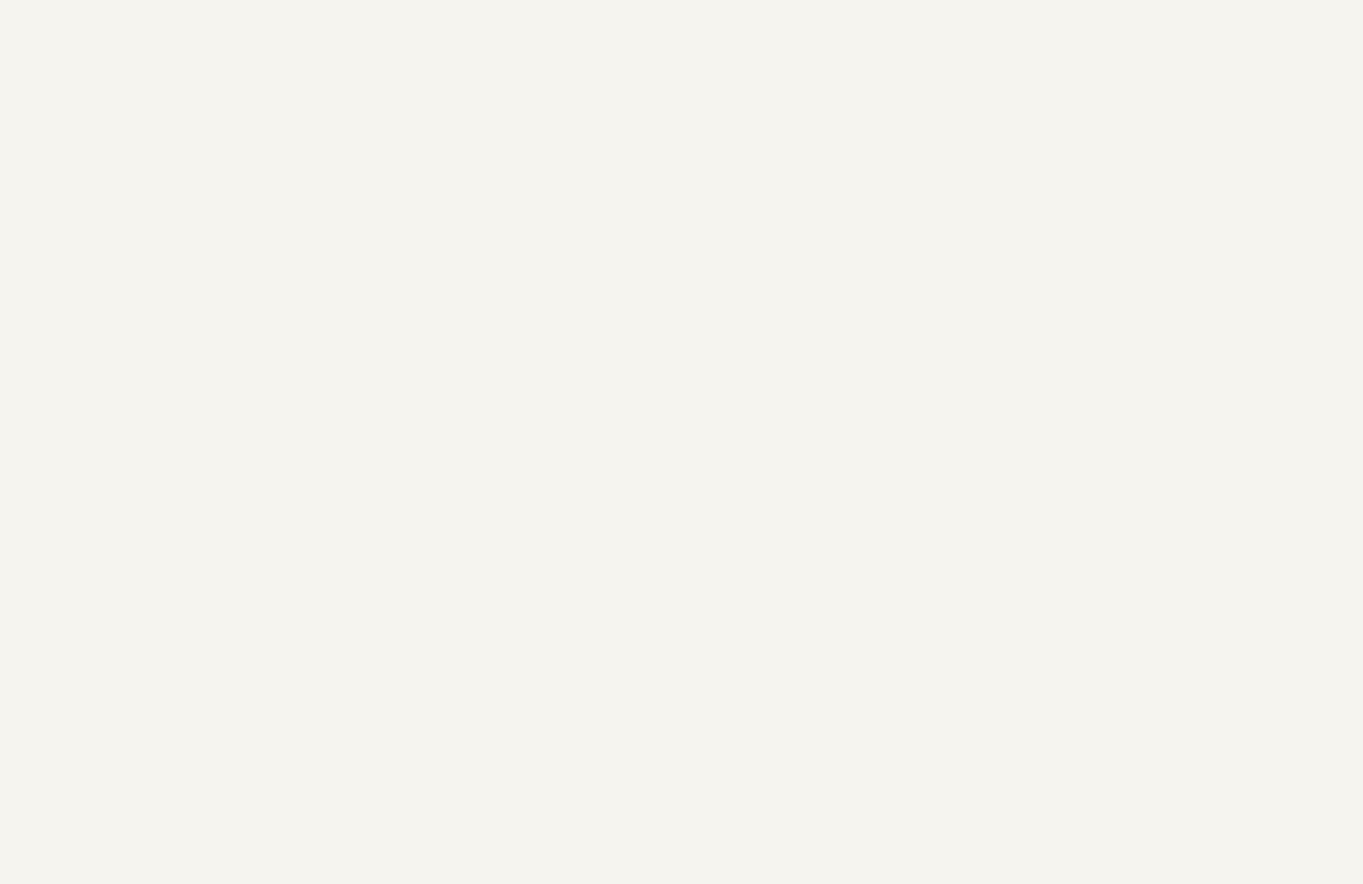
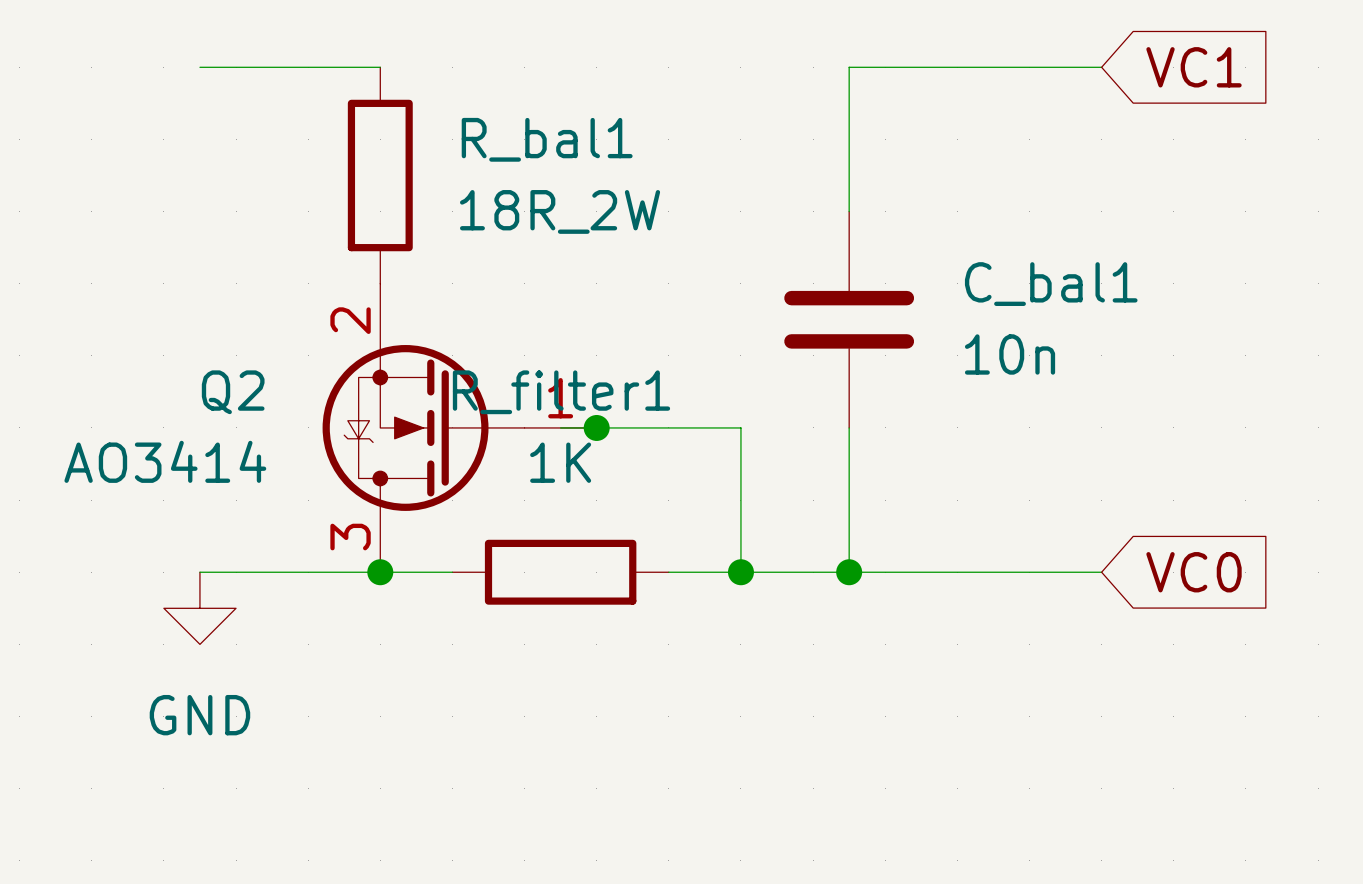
wire: none -> (199, 67) (380, 67)
wire: none -> (1101, 67) (849, 67) (849, 211)
global label: none -> VC1 (1194, 67)
R_bal1: none -> 18R_2W (380, 175)
C_bal1: none -> 10n (849, 319)
Q2: none -> AO3414 (459, 427)
wire: none -> (560, 427) (740, 427) (740, 572)
junction: none -> (596, 427)
wire: none -> (849, 427) (849, 572)
wire: none -> (199, 572) (452, 572)
junction: none -> (380, 572)
R_filter1: none -> 1K (560, 572)
wire: none -> (668, 572) (1101, 572)
junction: none -> (740, 572)
junction: none -> (849, 572)
global label: none -> VC0 (1194, 572)
power symbol: none -> GND (199, 608)

